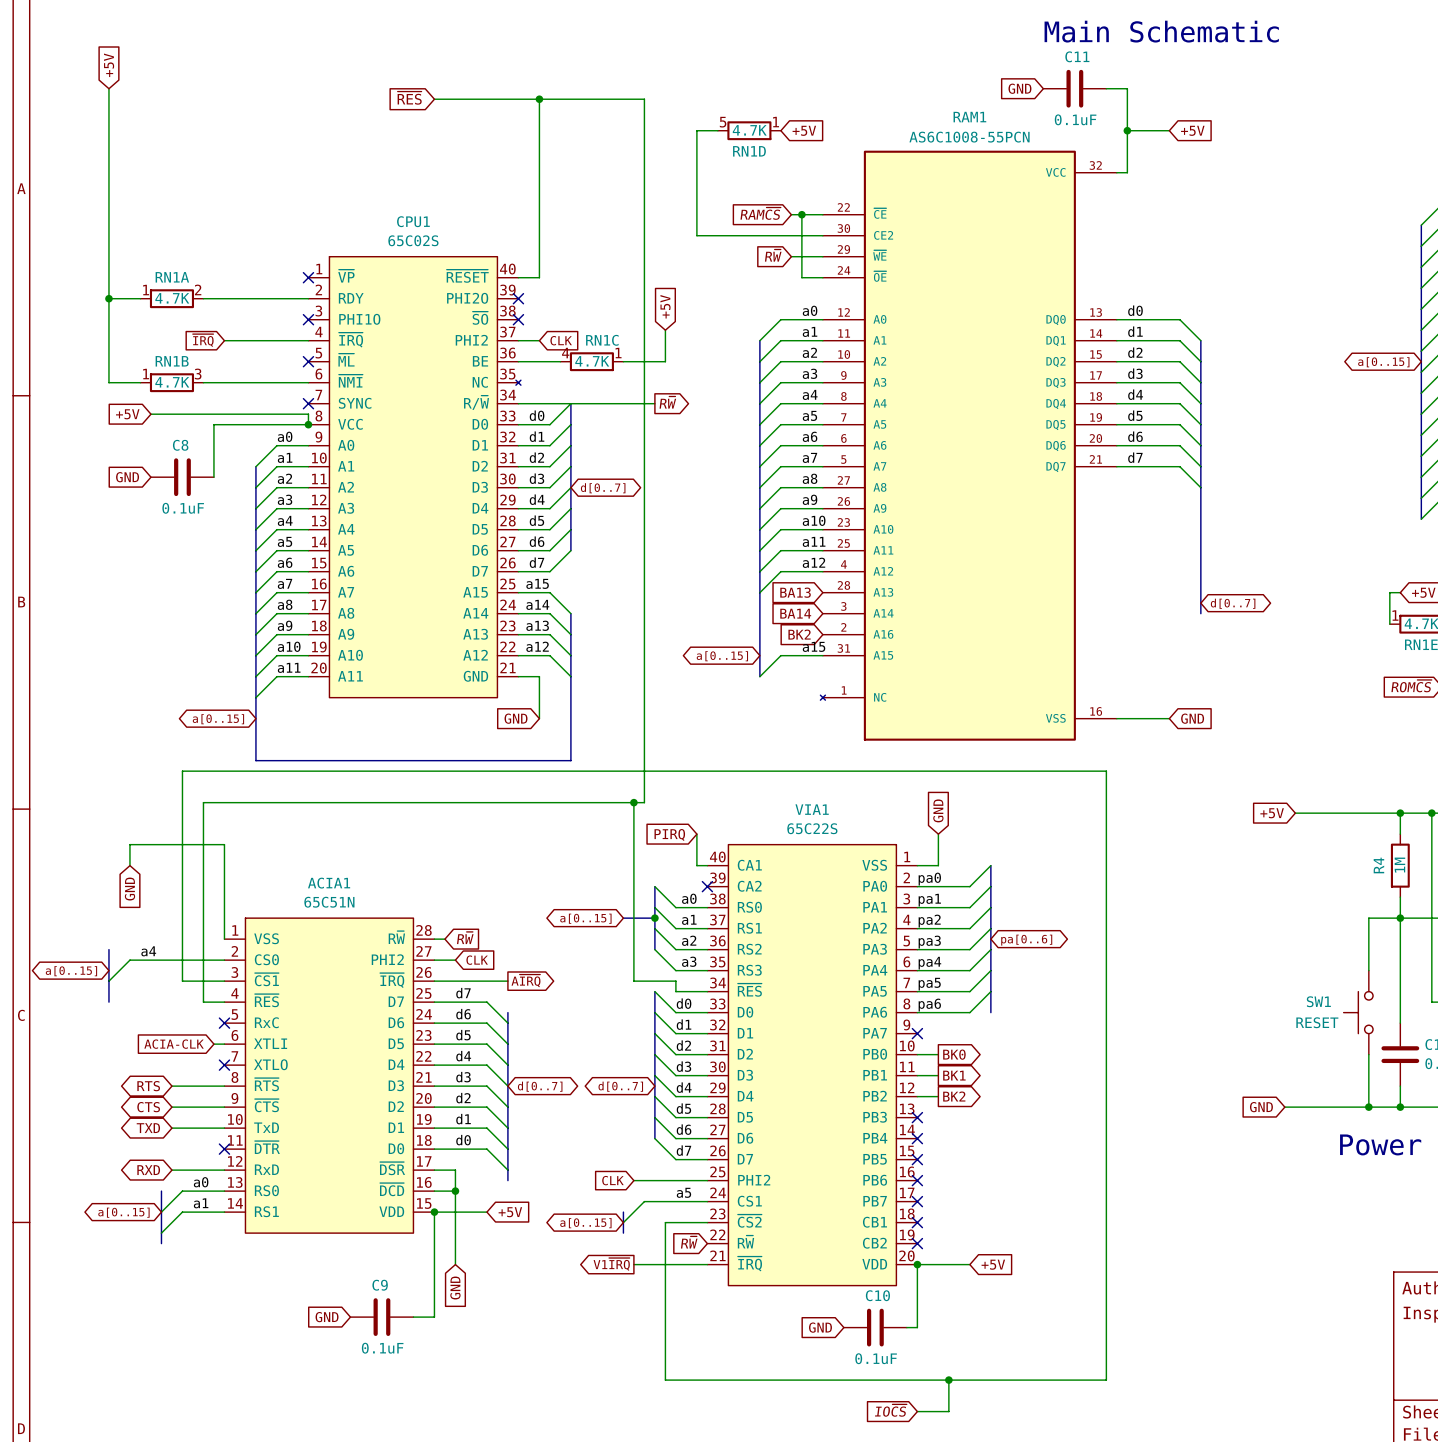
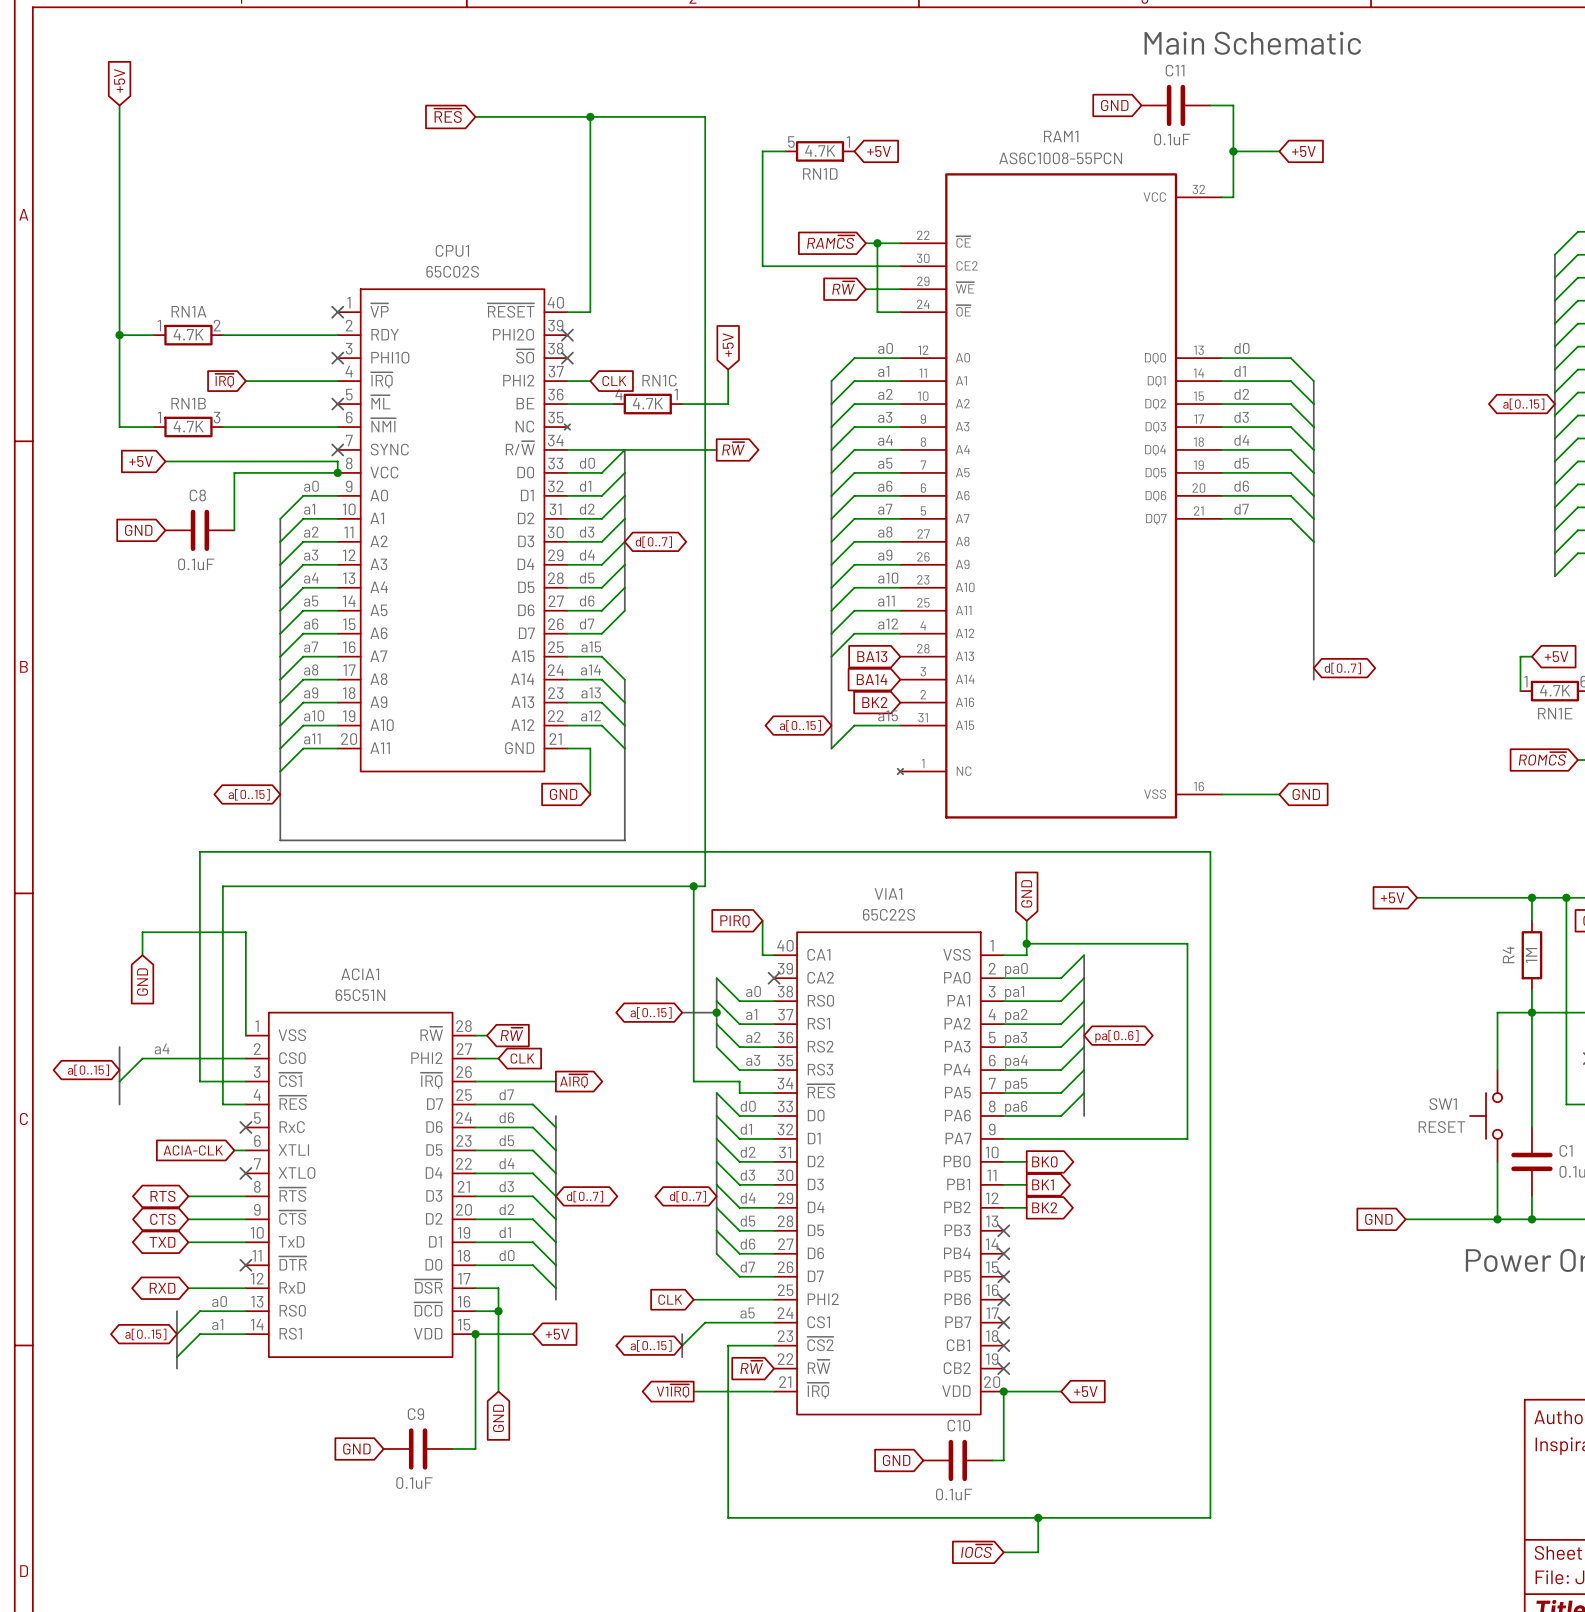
wire: none -> (1026, 943) (1187, 943) (1187, 1138) (1003, 1138)
junction: none -> (1026, 943)
no-connect mark: (917, 1033) -> none

